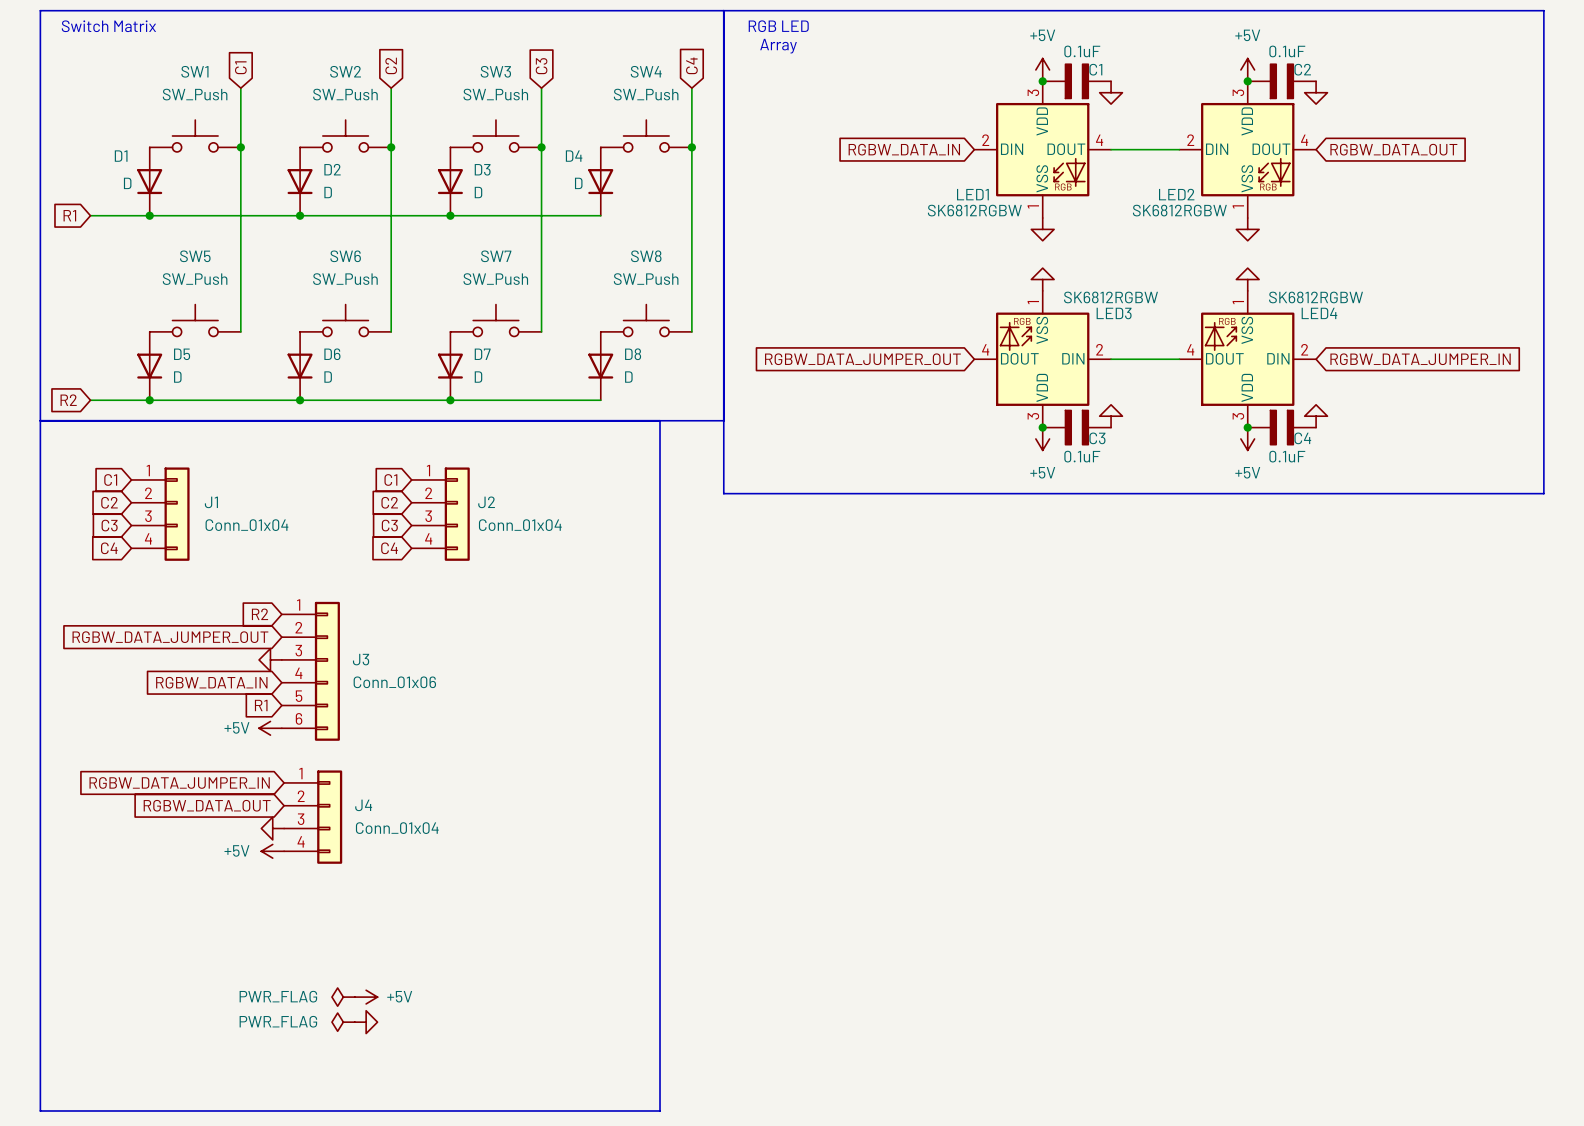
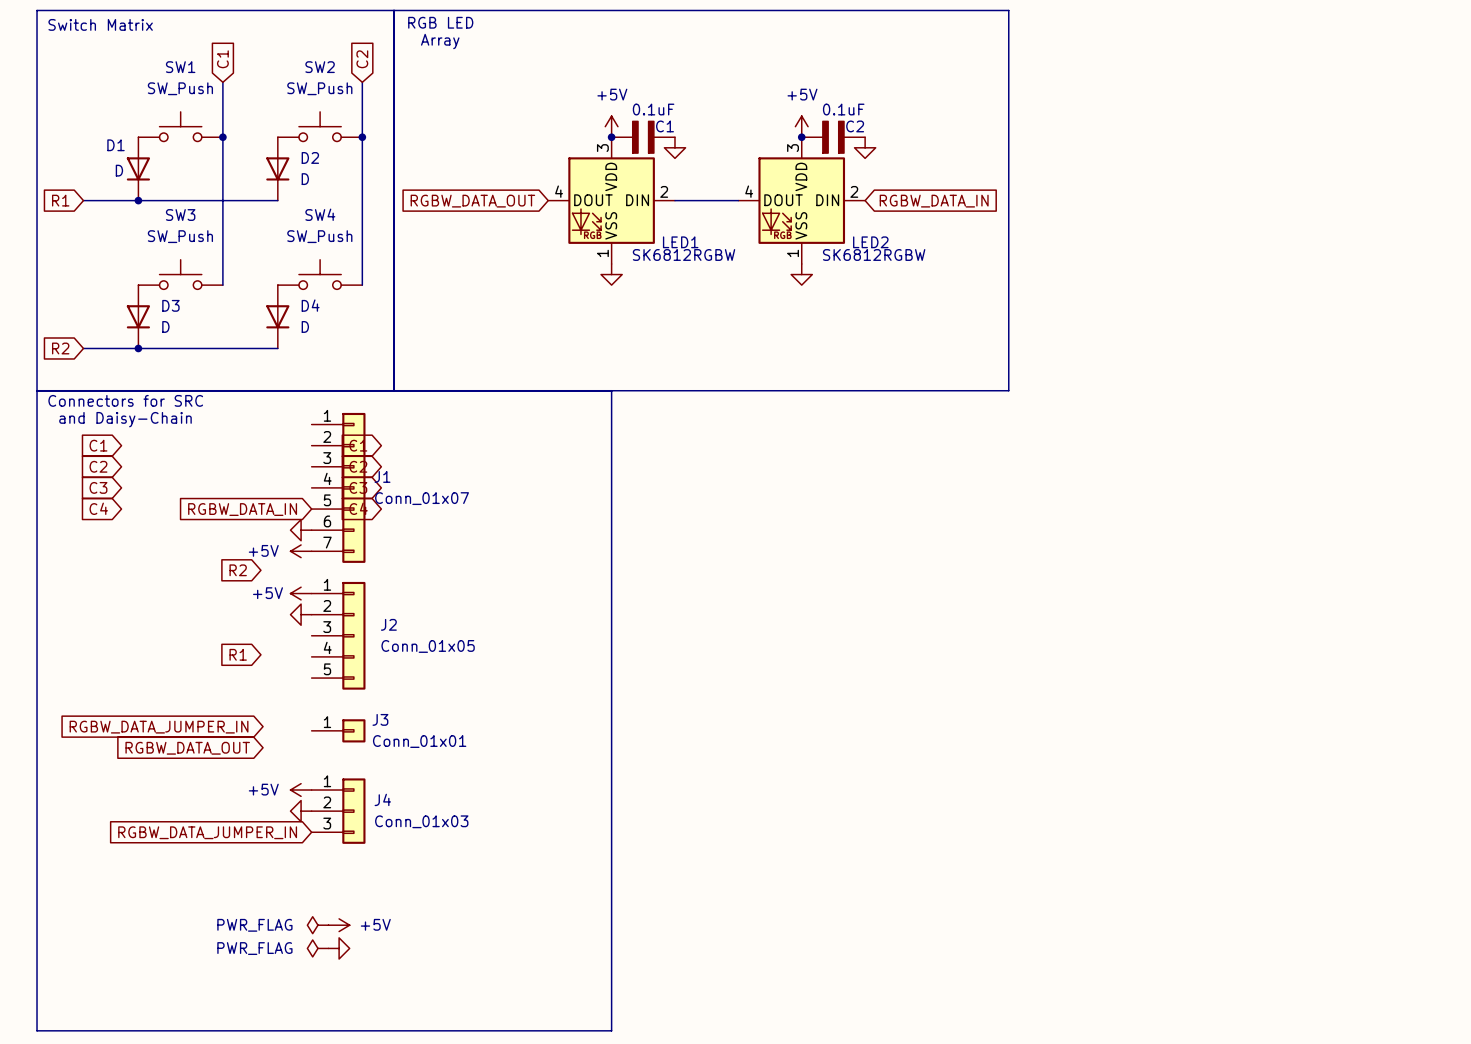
line: none -> (394, 10) (394, 390)
line: (723, 10) (723, 493) (1543, 493) (1543, 10) (1088, 10) -> (670, 390) (1008, 390) (1008, 10)
text: none -> RGB LED (440, 22)
text: RGB LED (778, 26) -> none
text: none -> Array (440, 41)
text: Array (778, 46) -> none
global label: C4 (691, 65) -> none
global label: C3 (541, 66) -> none
power symbol: +5V (1042, 69) -> none
power symbol: +5V (1247, 69) -> none
junction: (1042, 81) -> none
C1 position: (1076, 81) -> (643, 137)
junction: (1247, 81) -> none
C2 position: (1281, 81) -> (833, 137)
wire: (541, 88) (541, 331) -> none
wire: (691, 88) (691, 331) -> none
power symbol: (1111, 92) -> none
power symbol: (1316, 92) -> none
SW3 position: (495, 135) -> (180, 274)
SW4 position: (646, 135) -> (320, 274)
power symbol: none -> +5V (611, 126)
power symbol: none -> +5V (801, 126)
junction: (541, 147) -> none
junction position: (691, 147) -> (611, 137)
junction: none -> (801, 137)
global label rotation: 0° (904, 149) -> 180° (934, 201)
LED1 flip: as is (1042, 149) -> left-right (611, 200)
LED1 position: (1042, 149) -> (611, 200)
wire: (1111, 149) (1179, 149) -> none
LED2 flip: as is (1247, 149) -> left-right (801, 200)
LED2 position: (1247, 149) -> (801, 200)
global label: RGBW_DATA_OUT (1393, 149) -> none
D4 name position: D4 (574, 156) -> D4 (310, 305)
power symbol: none -> (674, 147)
power symbol: none -> (865, 147)
D3 position: (450, 181) -> (138, 316)
D4 position: (600, 181) -> (277, 316)
D4 value position: D (578, 183) -> D (305, 326)
wire: (300, 215) (600, 215) -> none
junction: (300, 215) -> none
junction: (450, 215) -> none
global label: none -> RGBW_DATA_OUT (472, 201)
wire: none -> (674, 200) (738, 200)
power symbol: (1042, 229) -> none
power symbol: (1247, 229) -> none
power symbol: (1042, 279) -> none
power symbol: (1247, 279) -> none
power symbol: none -> (611, 274)
power symbol: none -> (801, 274)
wire: (240, 306) (240, 331) -> none
wire: (391, 306) (391, 331) -> none
SW5: SW_Push (195, 320) -> none
SW6: SW_Push (345, 320) -> none
SW7: SW_Push (495, 320) -> none
SW8: SW_Push (646, 320) -> none
global label: RGBW_DATA_JUMPER_OUT (862, 359) -> none
LED3: SK6812RGBW (1042, 359) -> none
wire: (1111, 359) (1179, 359) -> none
LED4: SK6812RGBW (1247, 359) -> none
global label: RGBW_DATA_JUMPER_IN (1420, 359) -> none
D5: D (149, 366) -> none
D6: D (300, 366) -> none
D7: D (450, 366) -> none
D8: D (600, 366) -> none
wire: none -> (83, 348) (277, 348)
global label position: R2 (68, 400) -> R2 (60, 348)
wire: (90, 400) (600, 400) -> none
junction position: (149, 400) -> (138, 348)
junction: (300, 400) -> none
junction: (450, 400) -> none
power symbol: (1111, 416) -> none
power symbol: (1316, 416) -> none
junction: (1042, 427) -> none
C3: 0.1uF (1076, 427) -> none
junction: (1247, 427) -> none
C4: 0.1uF (1281, 427) -> none
text: none -> Connectors for SRC (125, 400)
power symbol: +5V (1042, 438) -> none
power symbol: +5V (1247, 438) -> none
text: none -> and Daisy-Chain (125, 419)
J1 symbol: [131, 467, 190, 561] -> [311, 412, 366, 563]
J2 symbol: [411, 467, 470, 561] -> [311, 581, 366, 690]
J1 value: Conn_01x04 (246, 525) -> Conn_01x07 (422, 498)
J2 value: Conn_01x04 (520, 525) -> Conn_01x05 (428, 646)
power symbol: none -> (301, 530)
power symbol: none -> +5V (301, 551)
J3 symbol: [281, 601, 340, 741] -> [311, 719, 366, 743]
global label: RGBW_DATA_JUMPER_OUT (170, 637) -> none
power symbol: none -> +5V (301, 593)
power symbol: (270, 659) -> none
power symbol: none -> (301, 614)
global label position: RGBW_DATA_IN (211, 682) -> RGBW_DATA_IN (242, 509)
J3 value: Conn_01x06 (394, 682) -> Conn_01x01 (419, 741)
power symbol: +5V (270, 728) -> none
J4 symbol: [284, 770, 343, 864] -> [311, 778, 366, 844]
power symbol position: (272, 828) -> (301, 811)
J4 value: Conn_01x04 (397, 828) -> Conn_01x03 (421, 821)
power symbol position: +5V (272, 851) -> +5V (301, 790)
global label: none -> RGBW_DATA_JUMPER_IN (207, 832)

